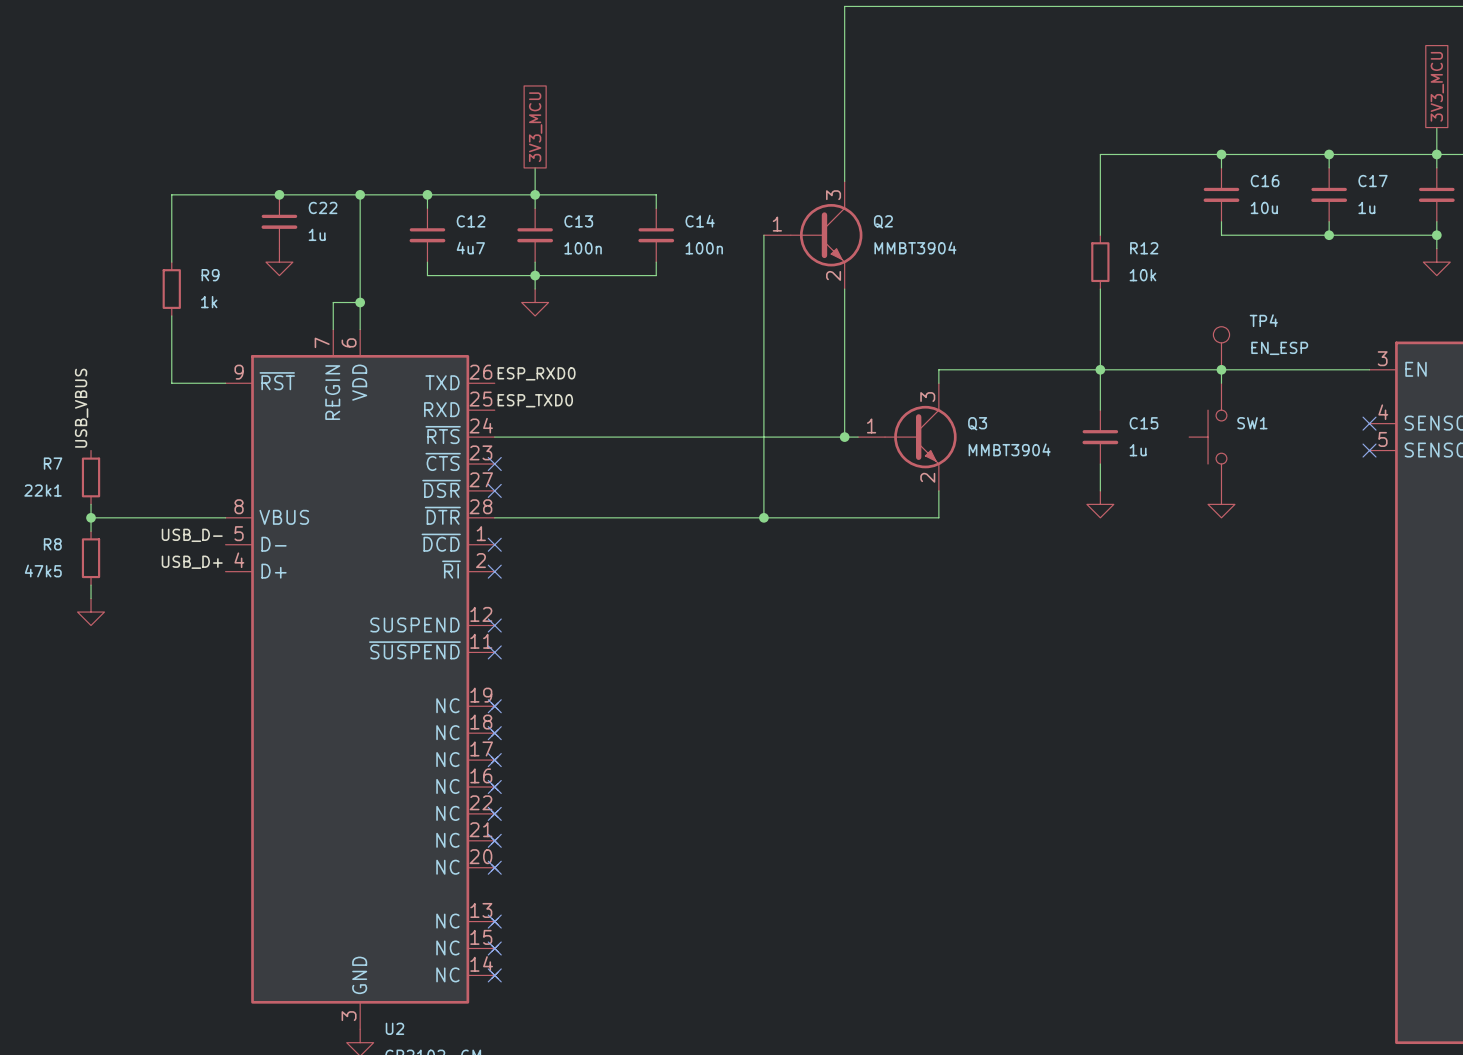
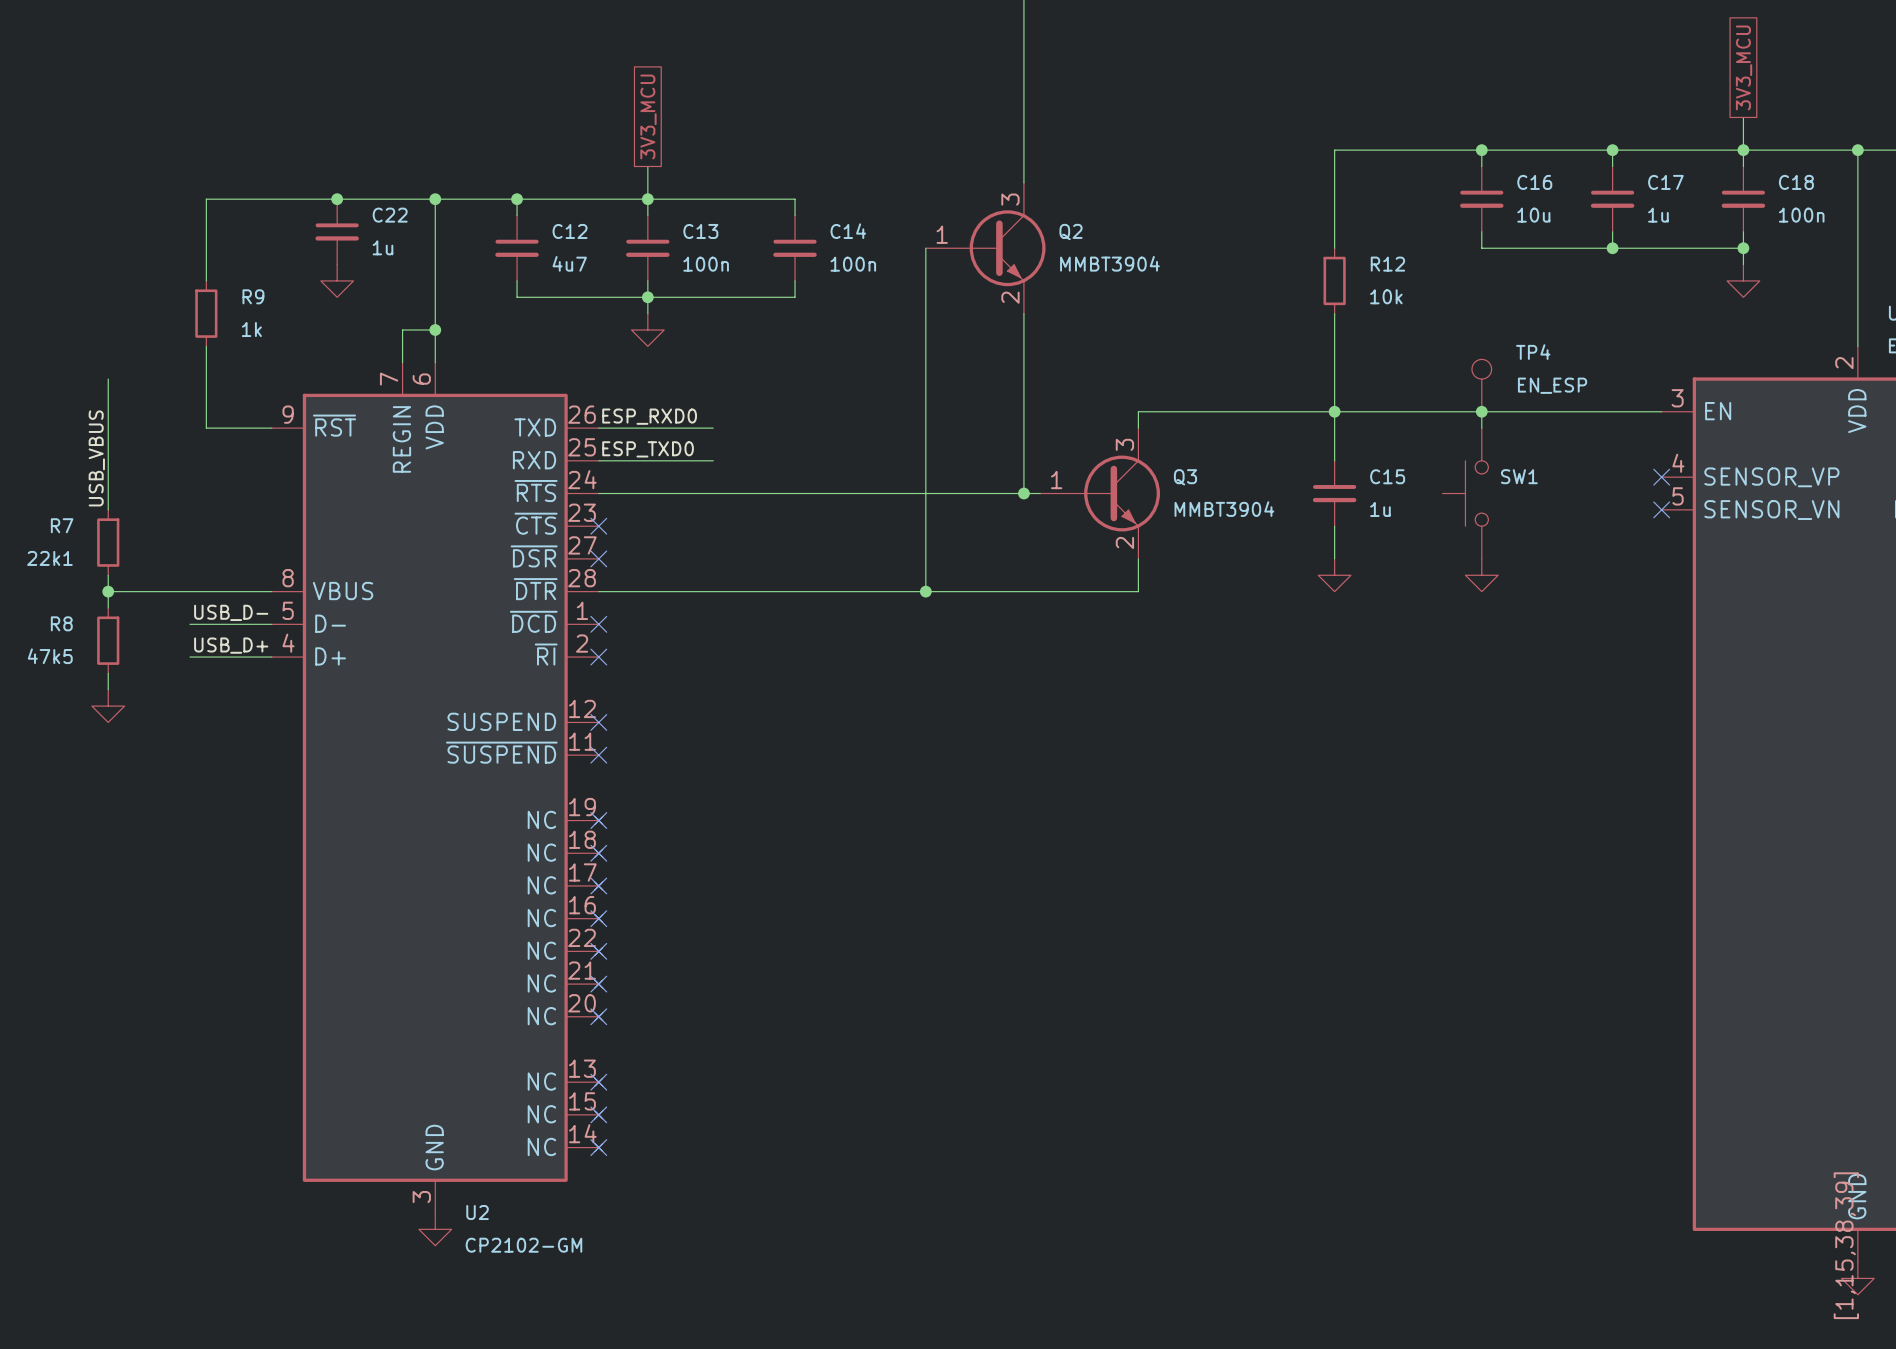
wire: none -> (108, 379) (108, 509)
wire: none -> (598, 428) (713, 428)
wire: none -> (598, 460) (713, 460)
wire: none -> (190, 624) (271, 624)
wire: none -> (190, 657) (271, 657)

